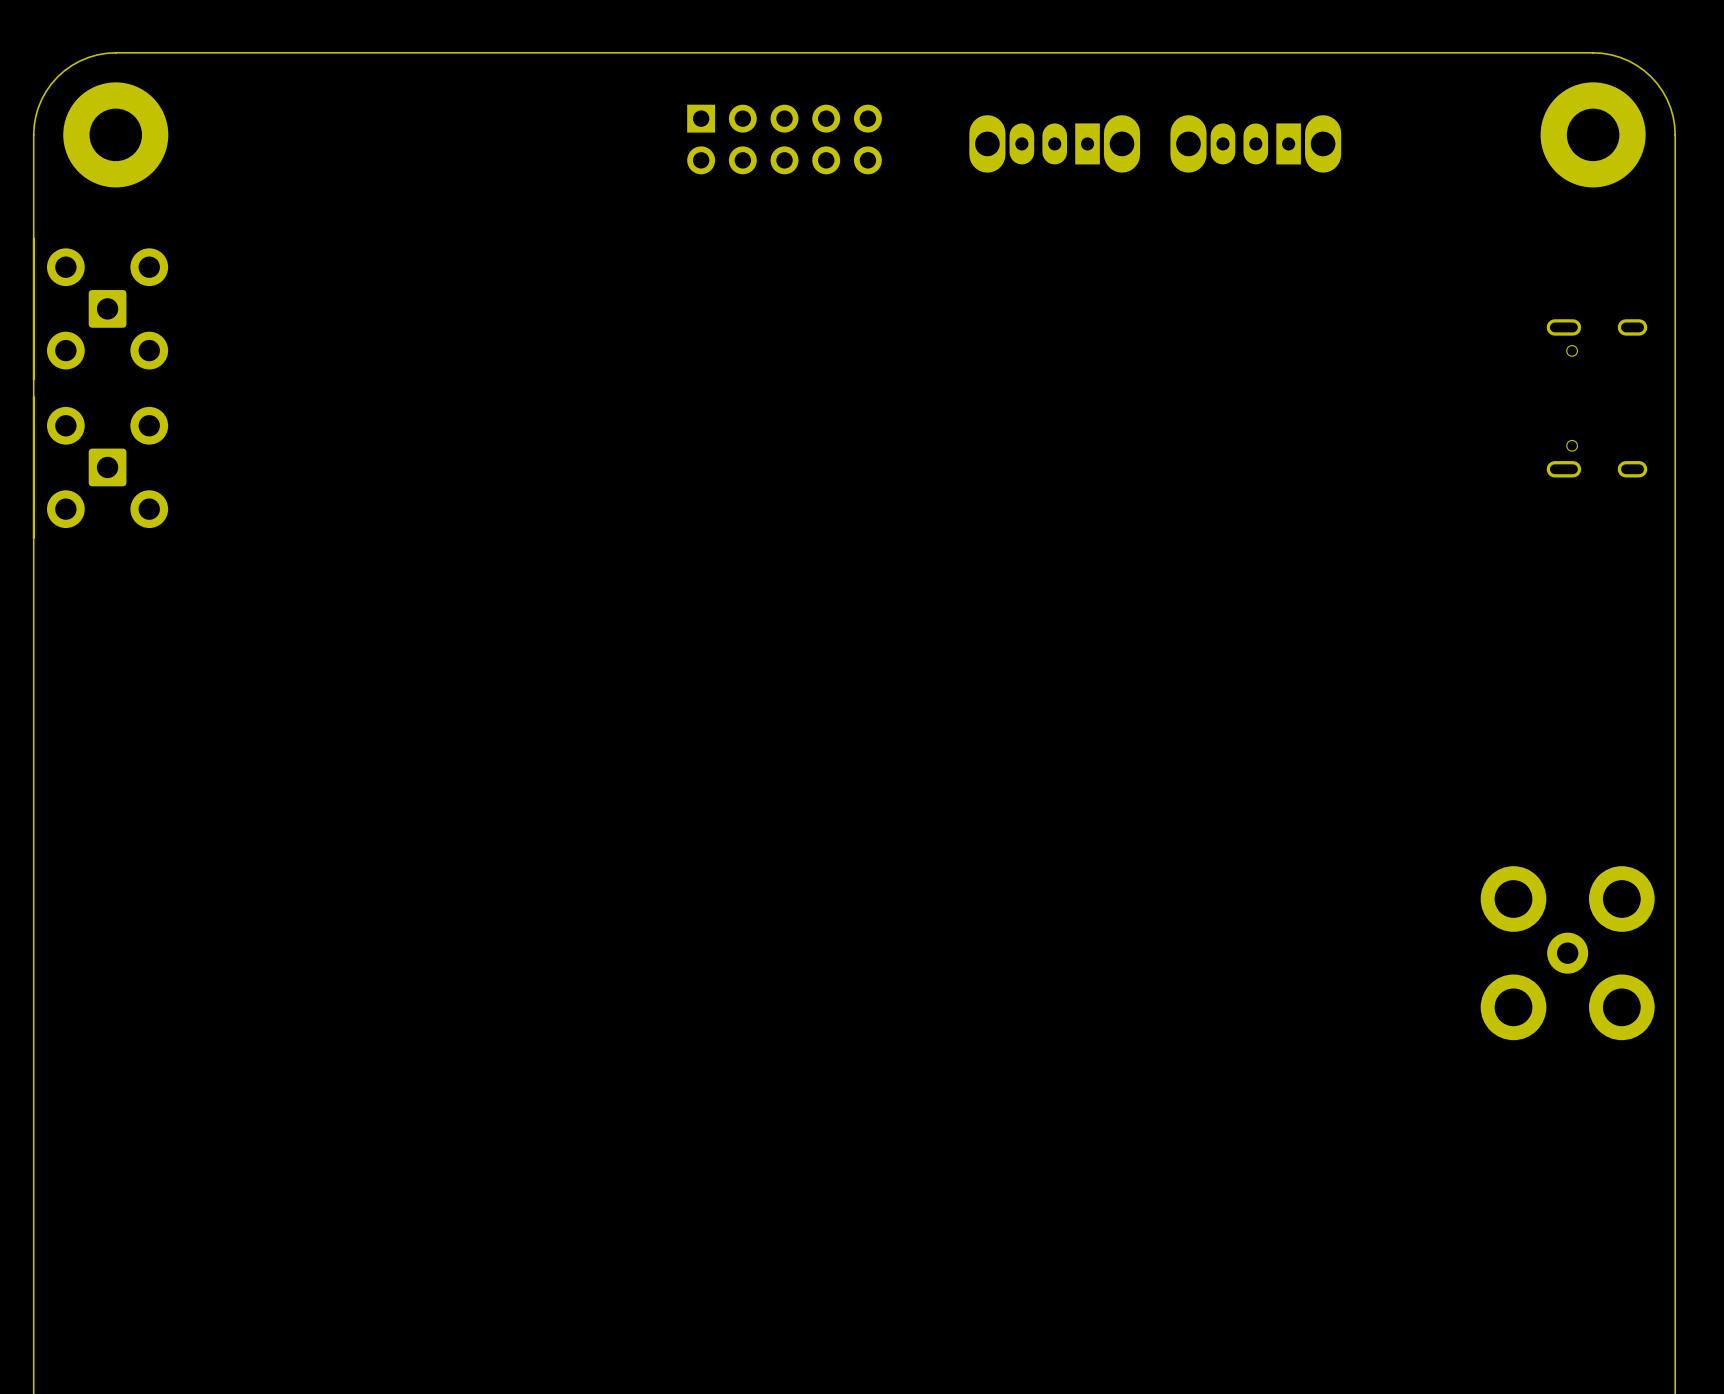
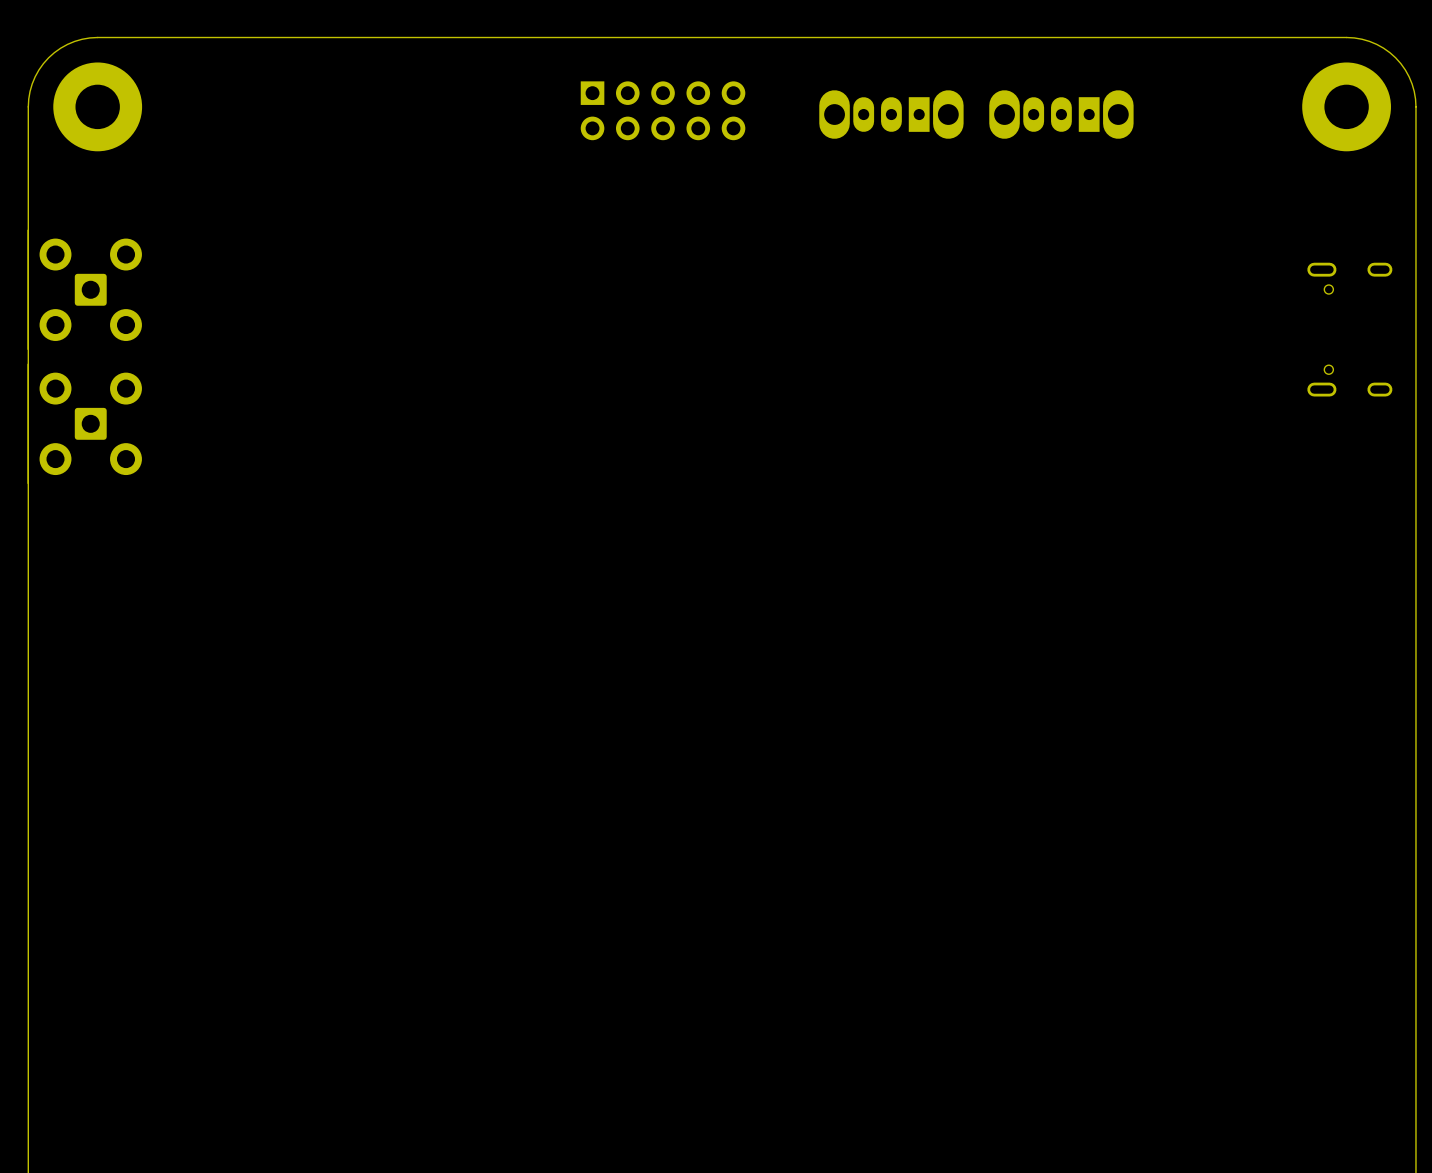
part position: (100, 308) -> (84, 289)
part position: (100, 467) -> (84, 423)
part: (1567, 953) -> none

